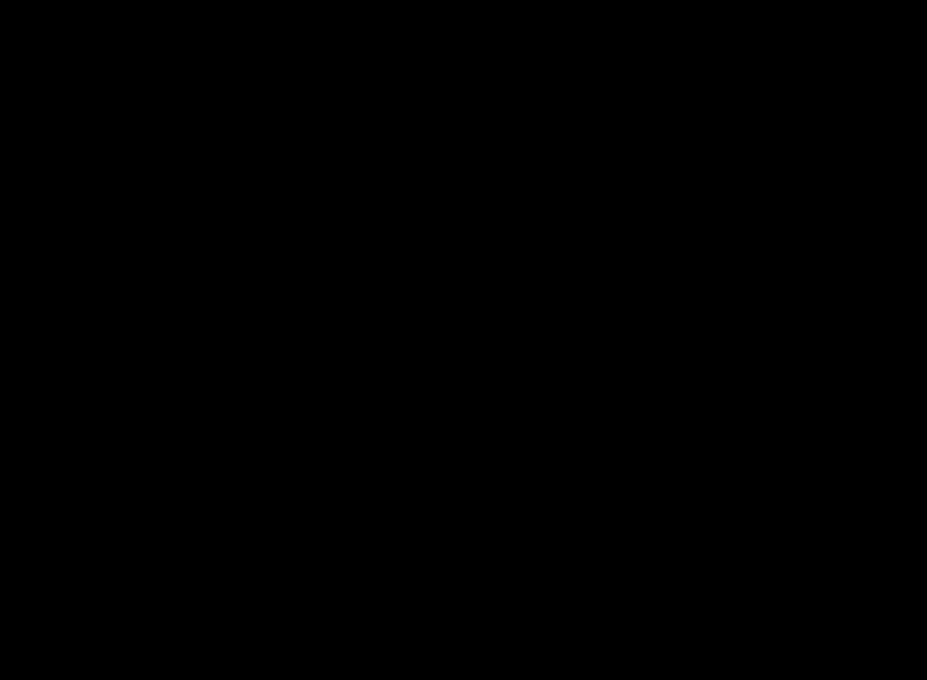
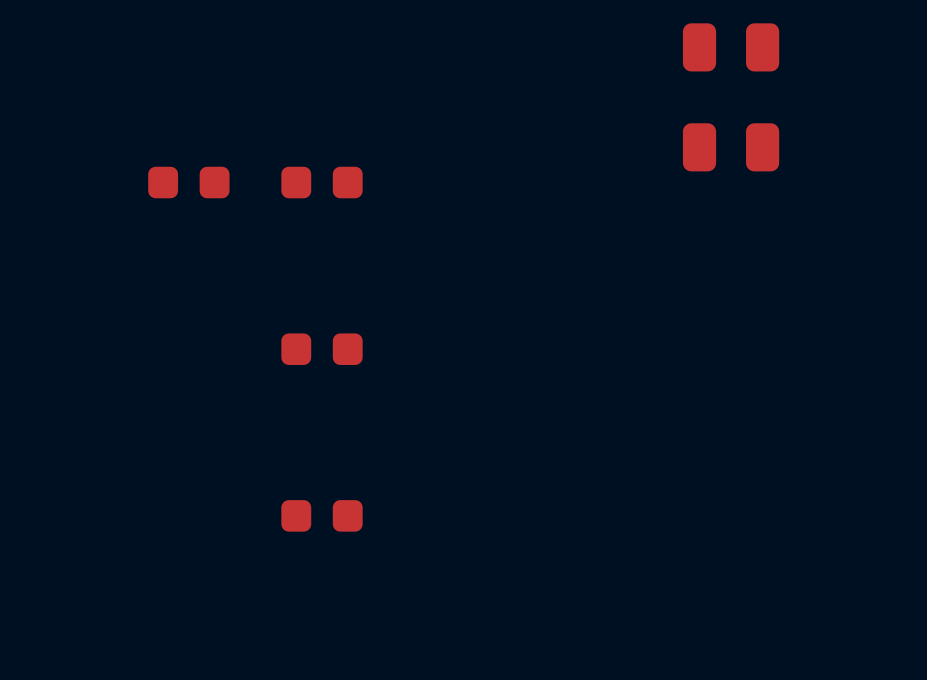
part: none -> (731, 47)
part: none -> (731, 147)
part: none -> (188, 182)
part: none -> (322, 182)
part: none -> (322, 349)
part: none -> (322, 515)

